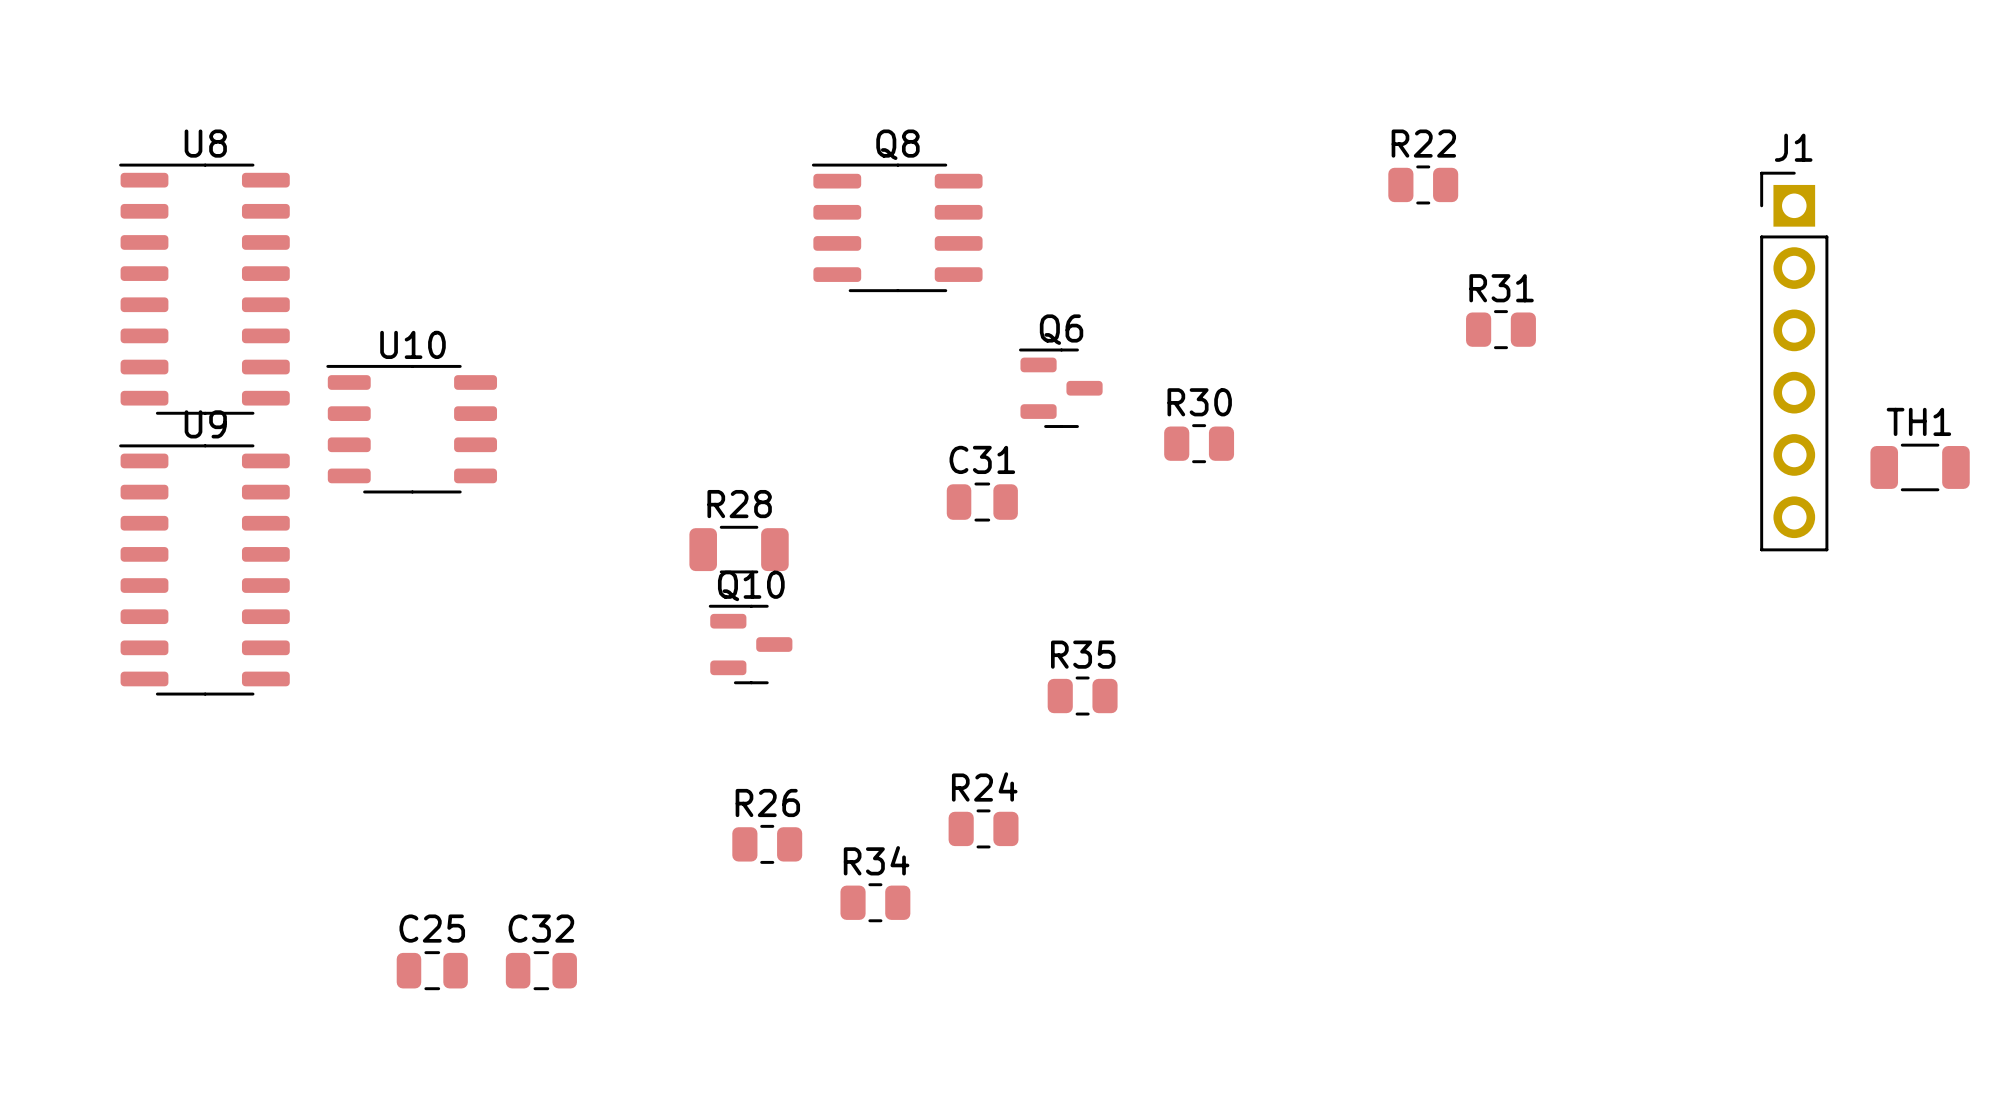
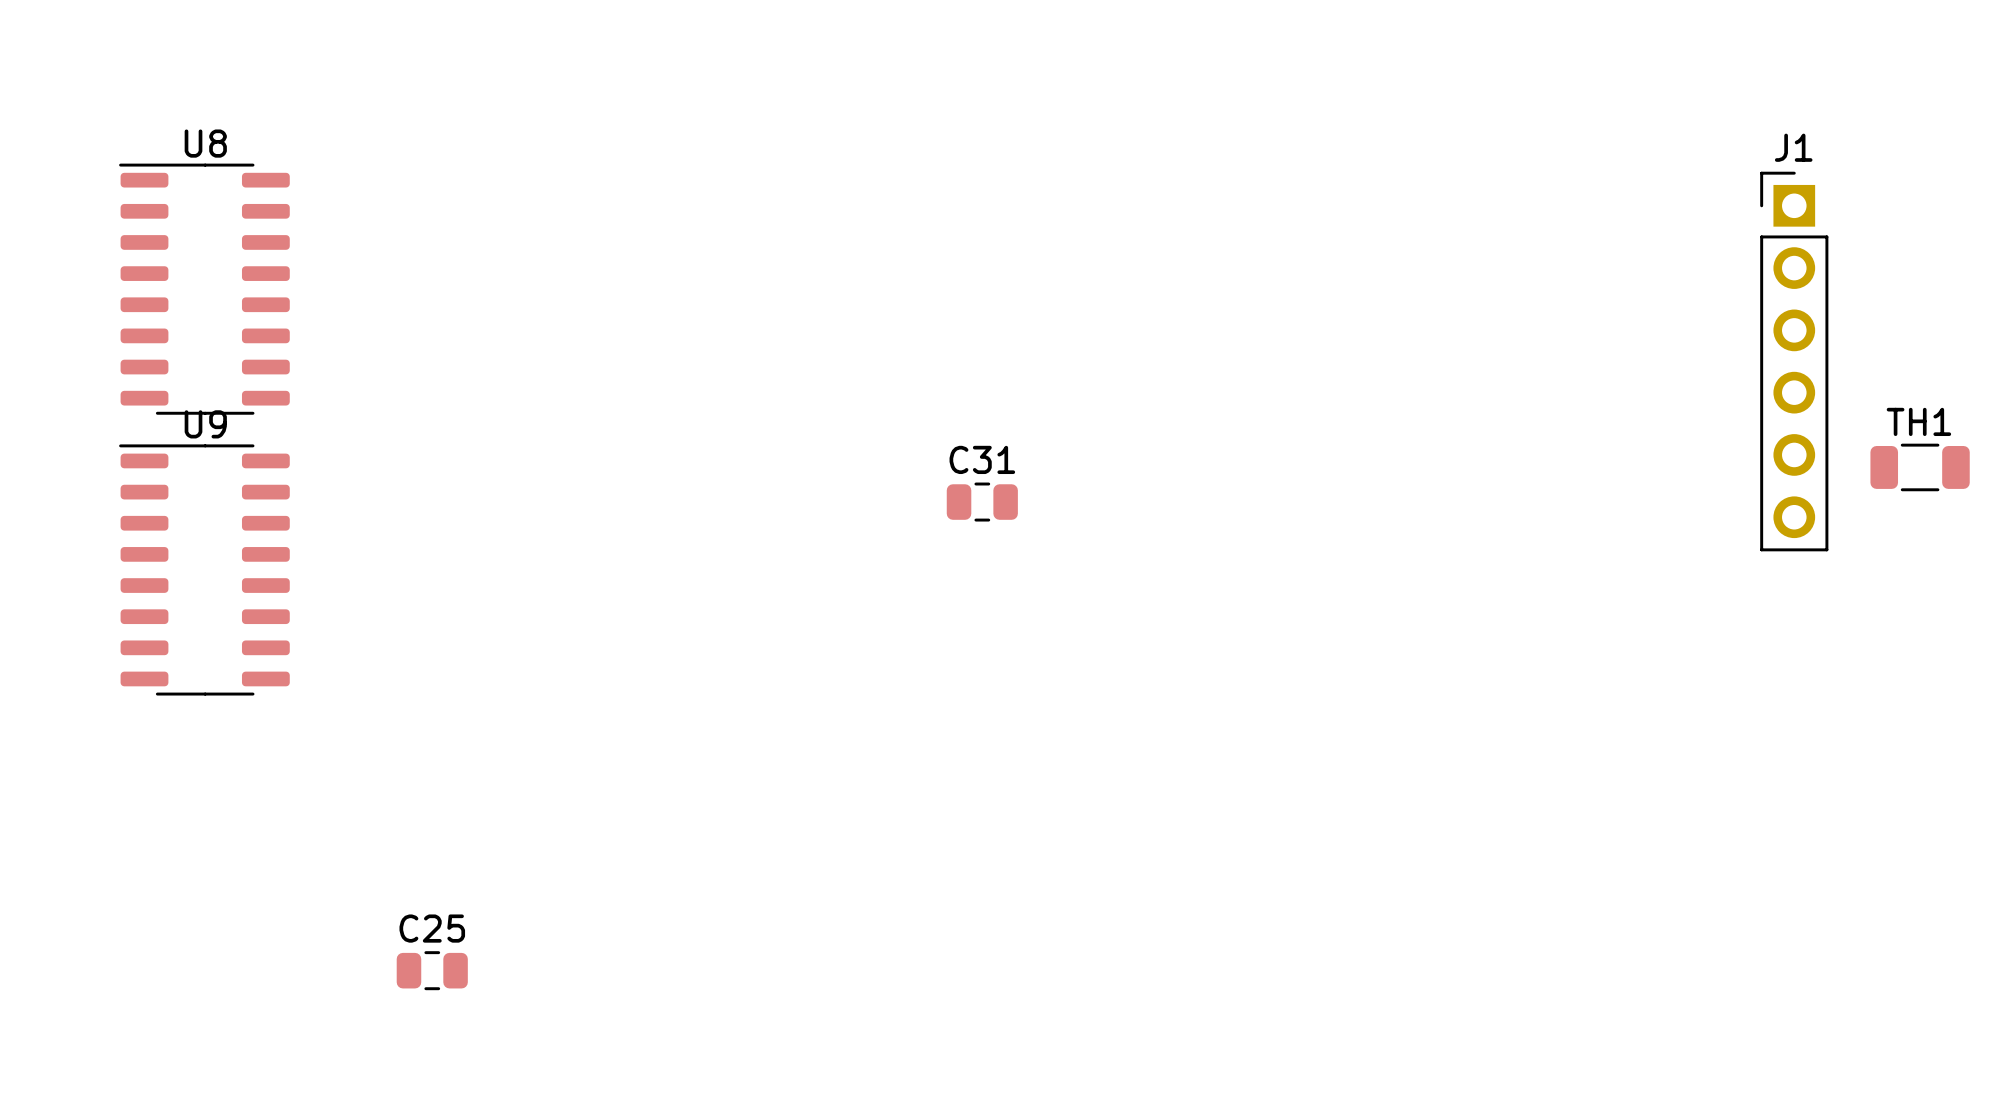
R22: (1423, 184) -> none
Q8: (897, 227) -> none
R31: (1500, 329) -> none
Q6: (1060, 388) -> none
U10: (411, 429) -> none
R30: (1199, 443) -> none
R28: (739, 549) -> none
Q10: (750, 644) -> none
R35: (1082, 696) -> none
R24: (983, 828) -> none
R26: (767, 844) -> none
R34: (875, 902) -> none
C32: (541, 970) -> none

